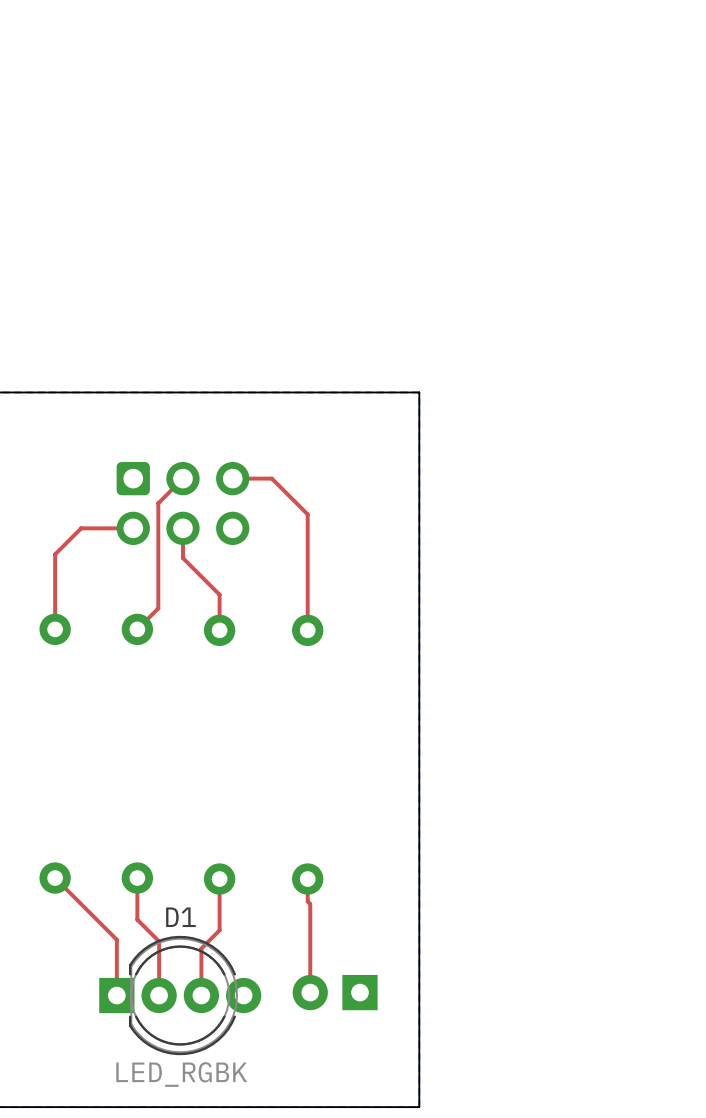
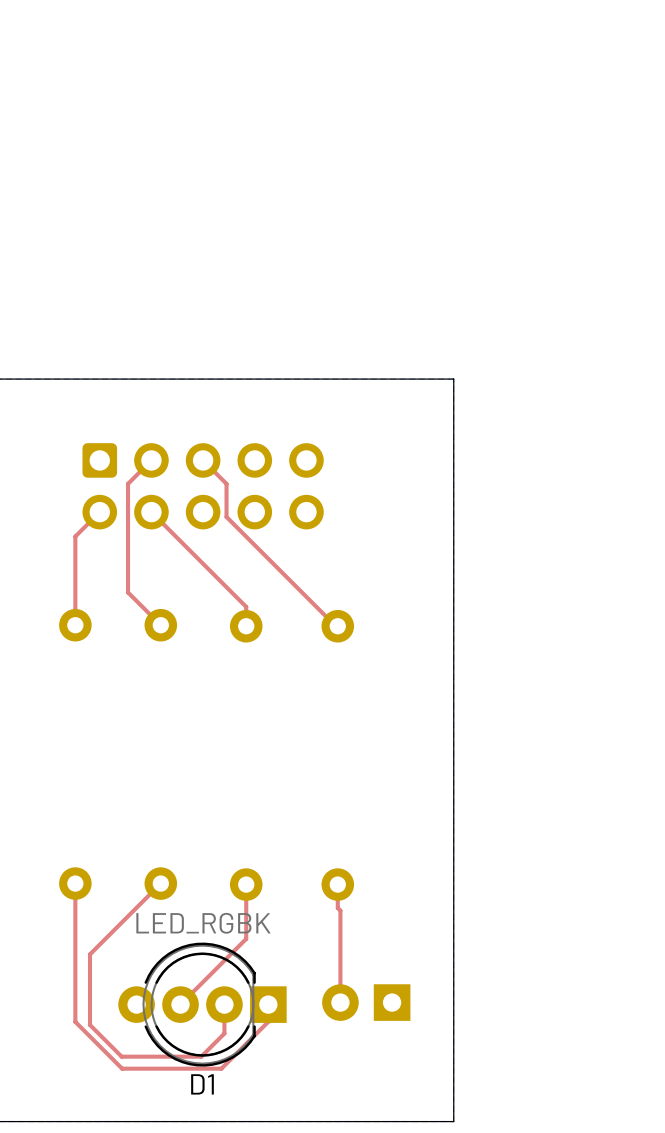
part footprint: [116, 461, 250, 545] -> [82, 443, 324, 530]
top track: none -> (203, 460) (226, 483) (226, 516) (335, 626)
top track: (182, 478) (158, 503) (158, 608) (137, 629) -> (151, 460) (128, 483) (128, 592) (160, 625)
top track: (232, 478) (271, 478) (307, 514) (307, 630) -> none
top track: (133, 528) (81, 528) (55, 554) -> (99, 512) (75, 536) (75, 547)
top track: (182, 528) (182, 558) (219, 594) (219, 611) -> (151, 512) (246, 606)
top track: (55, 878) (116, 939) (116, 995) -> (75, 883) (75, 1021) (122, 1068) (221, 1068) (268, 1021) (268, 1004)
top track: (137, 878) (137, 919) (159, 941) (159, 995) -> (160, 883) (90, 954) (90, 1025) (121, 1056) (201, 1056) (224, 1033) (224, 1004)
top track: (219, 930) (201, 948) (201, 995) -> (246, 937) (180, 1004)
D1 rotation: 0° (180, 995) -> 180° (202, 1004)

